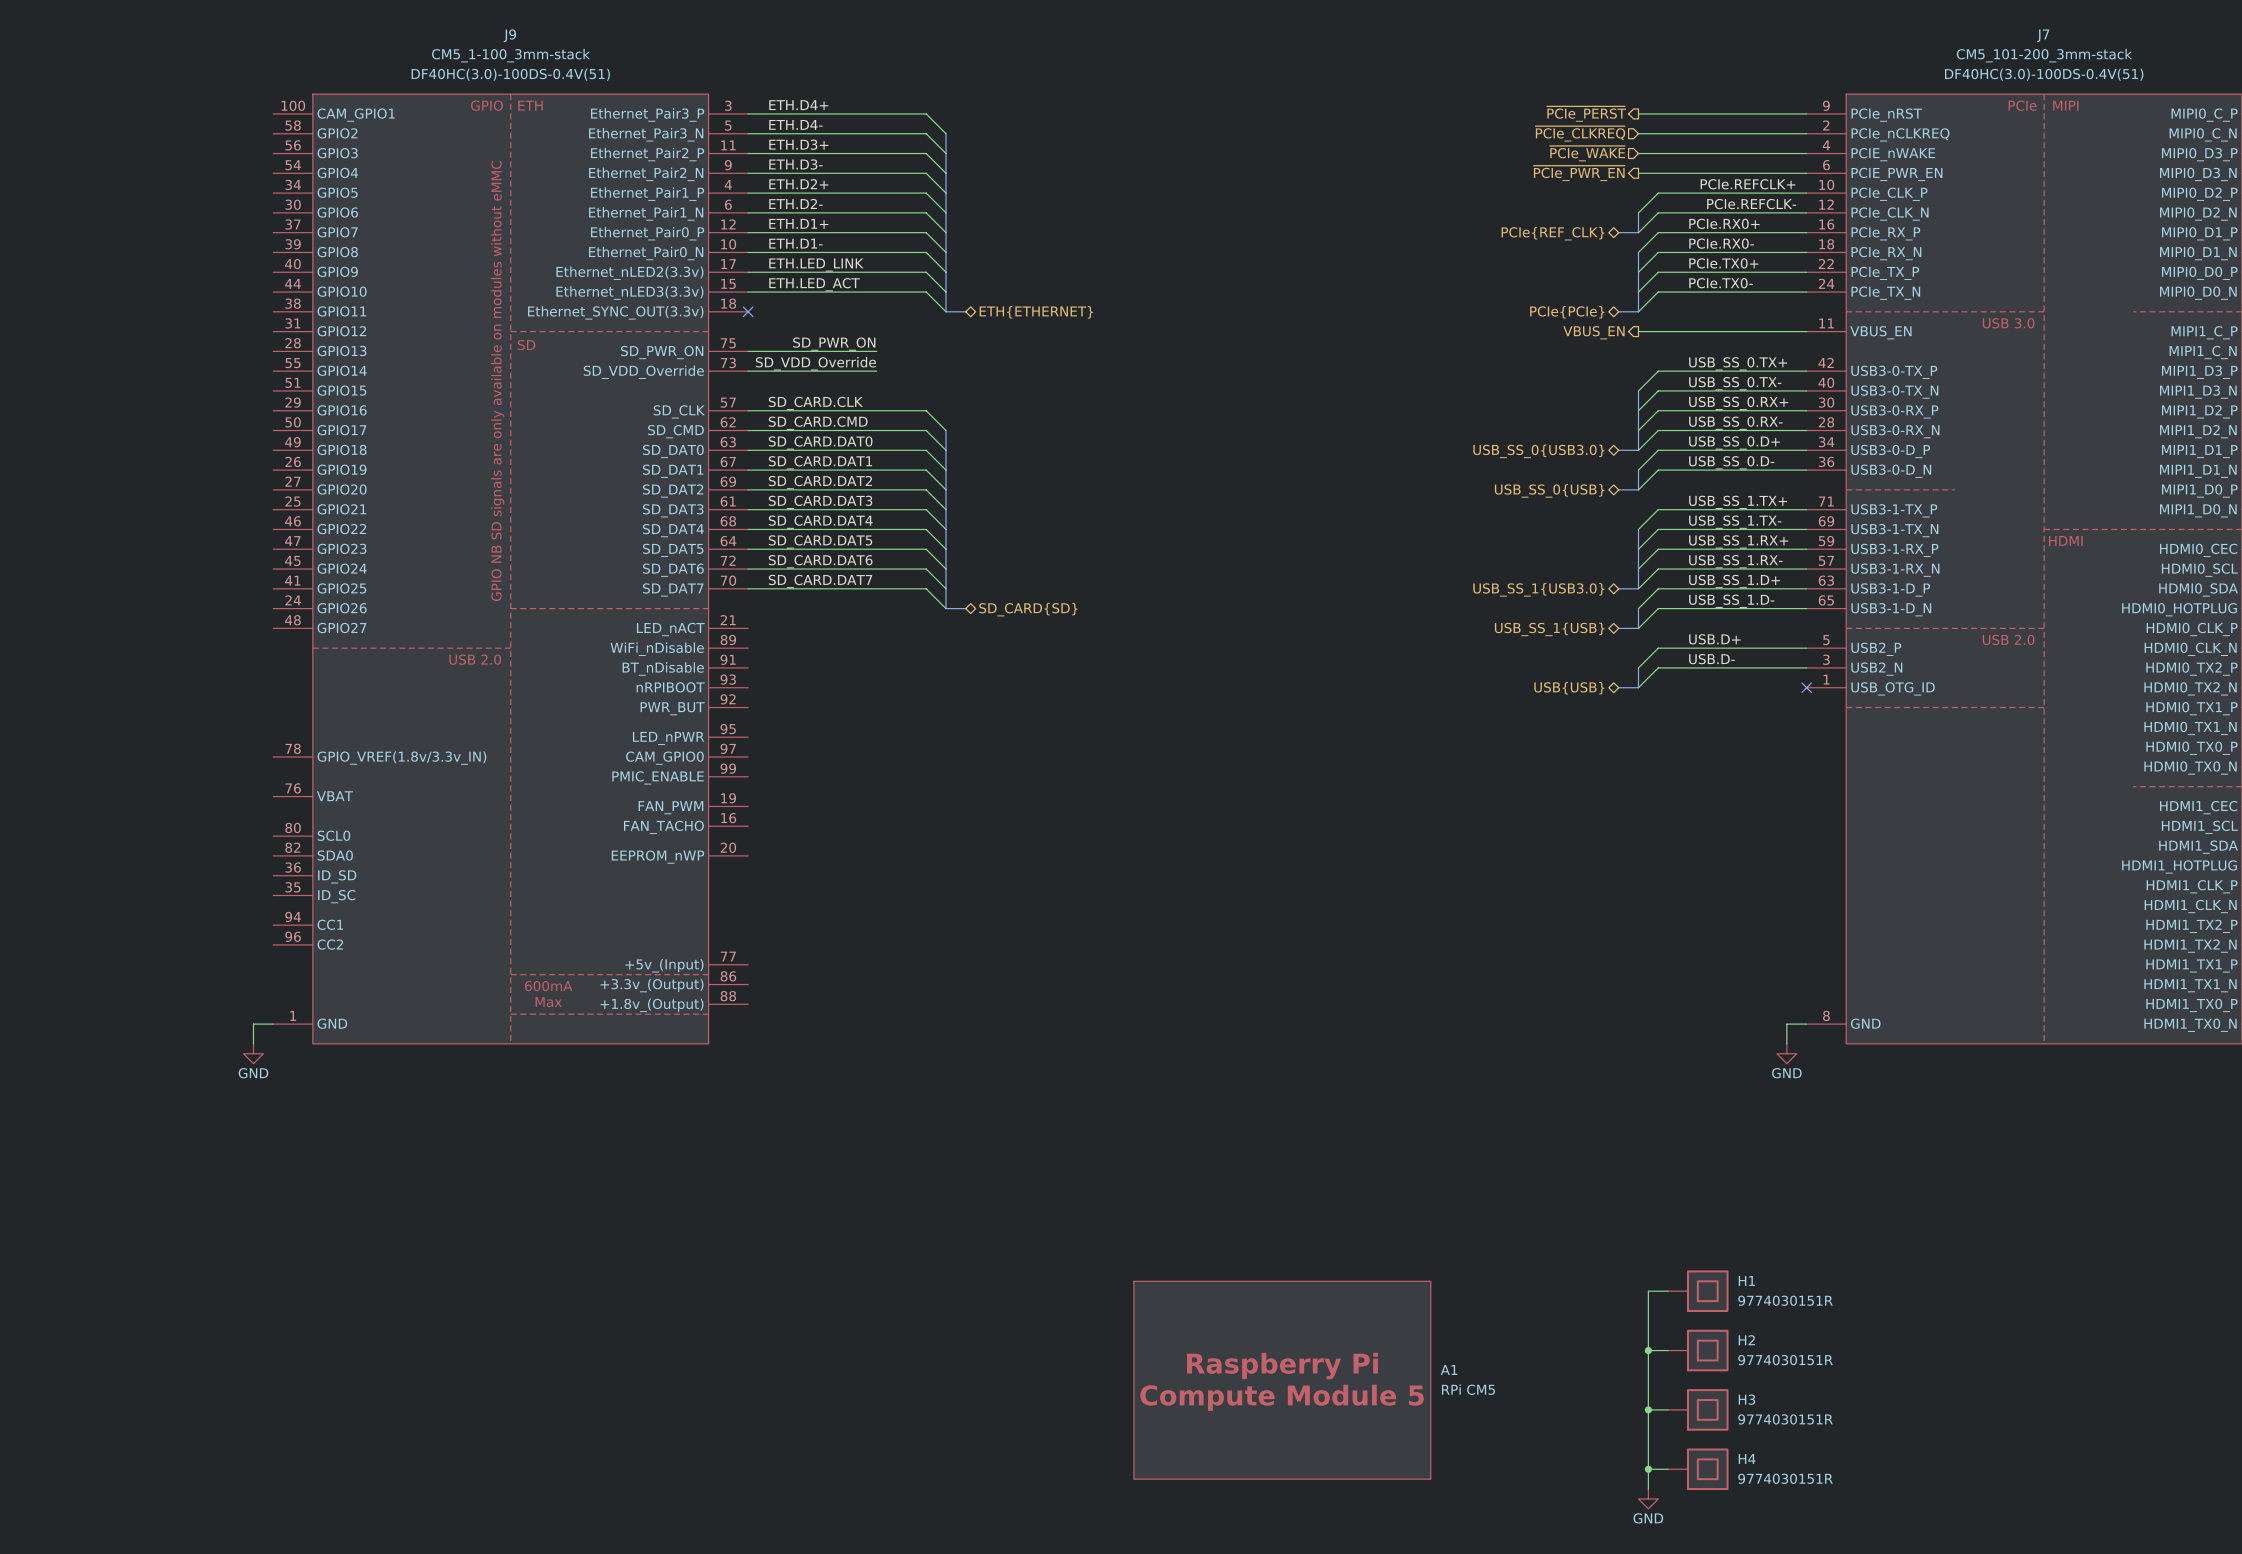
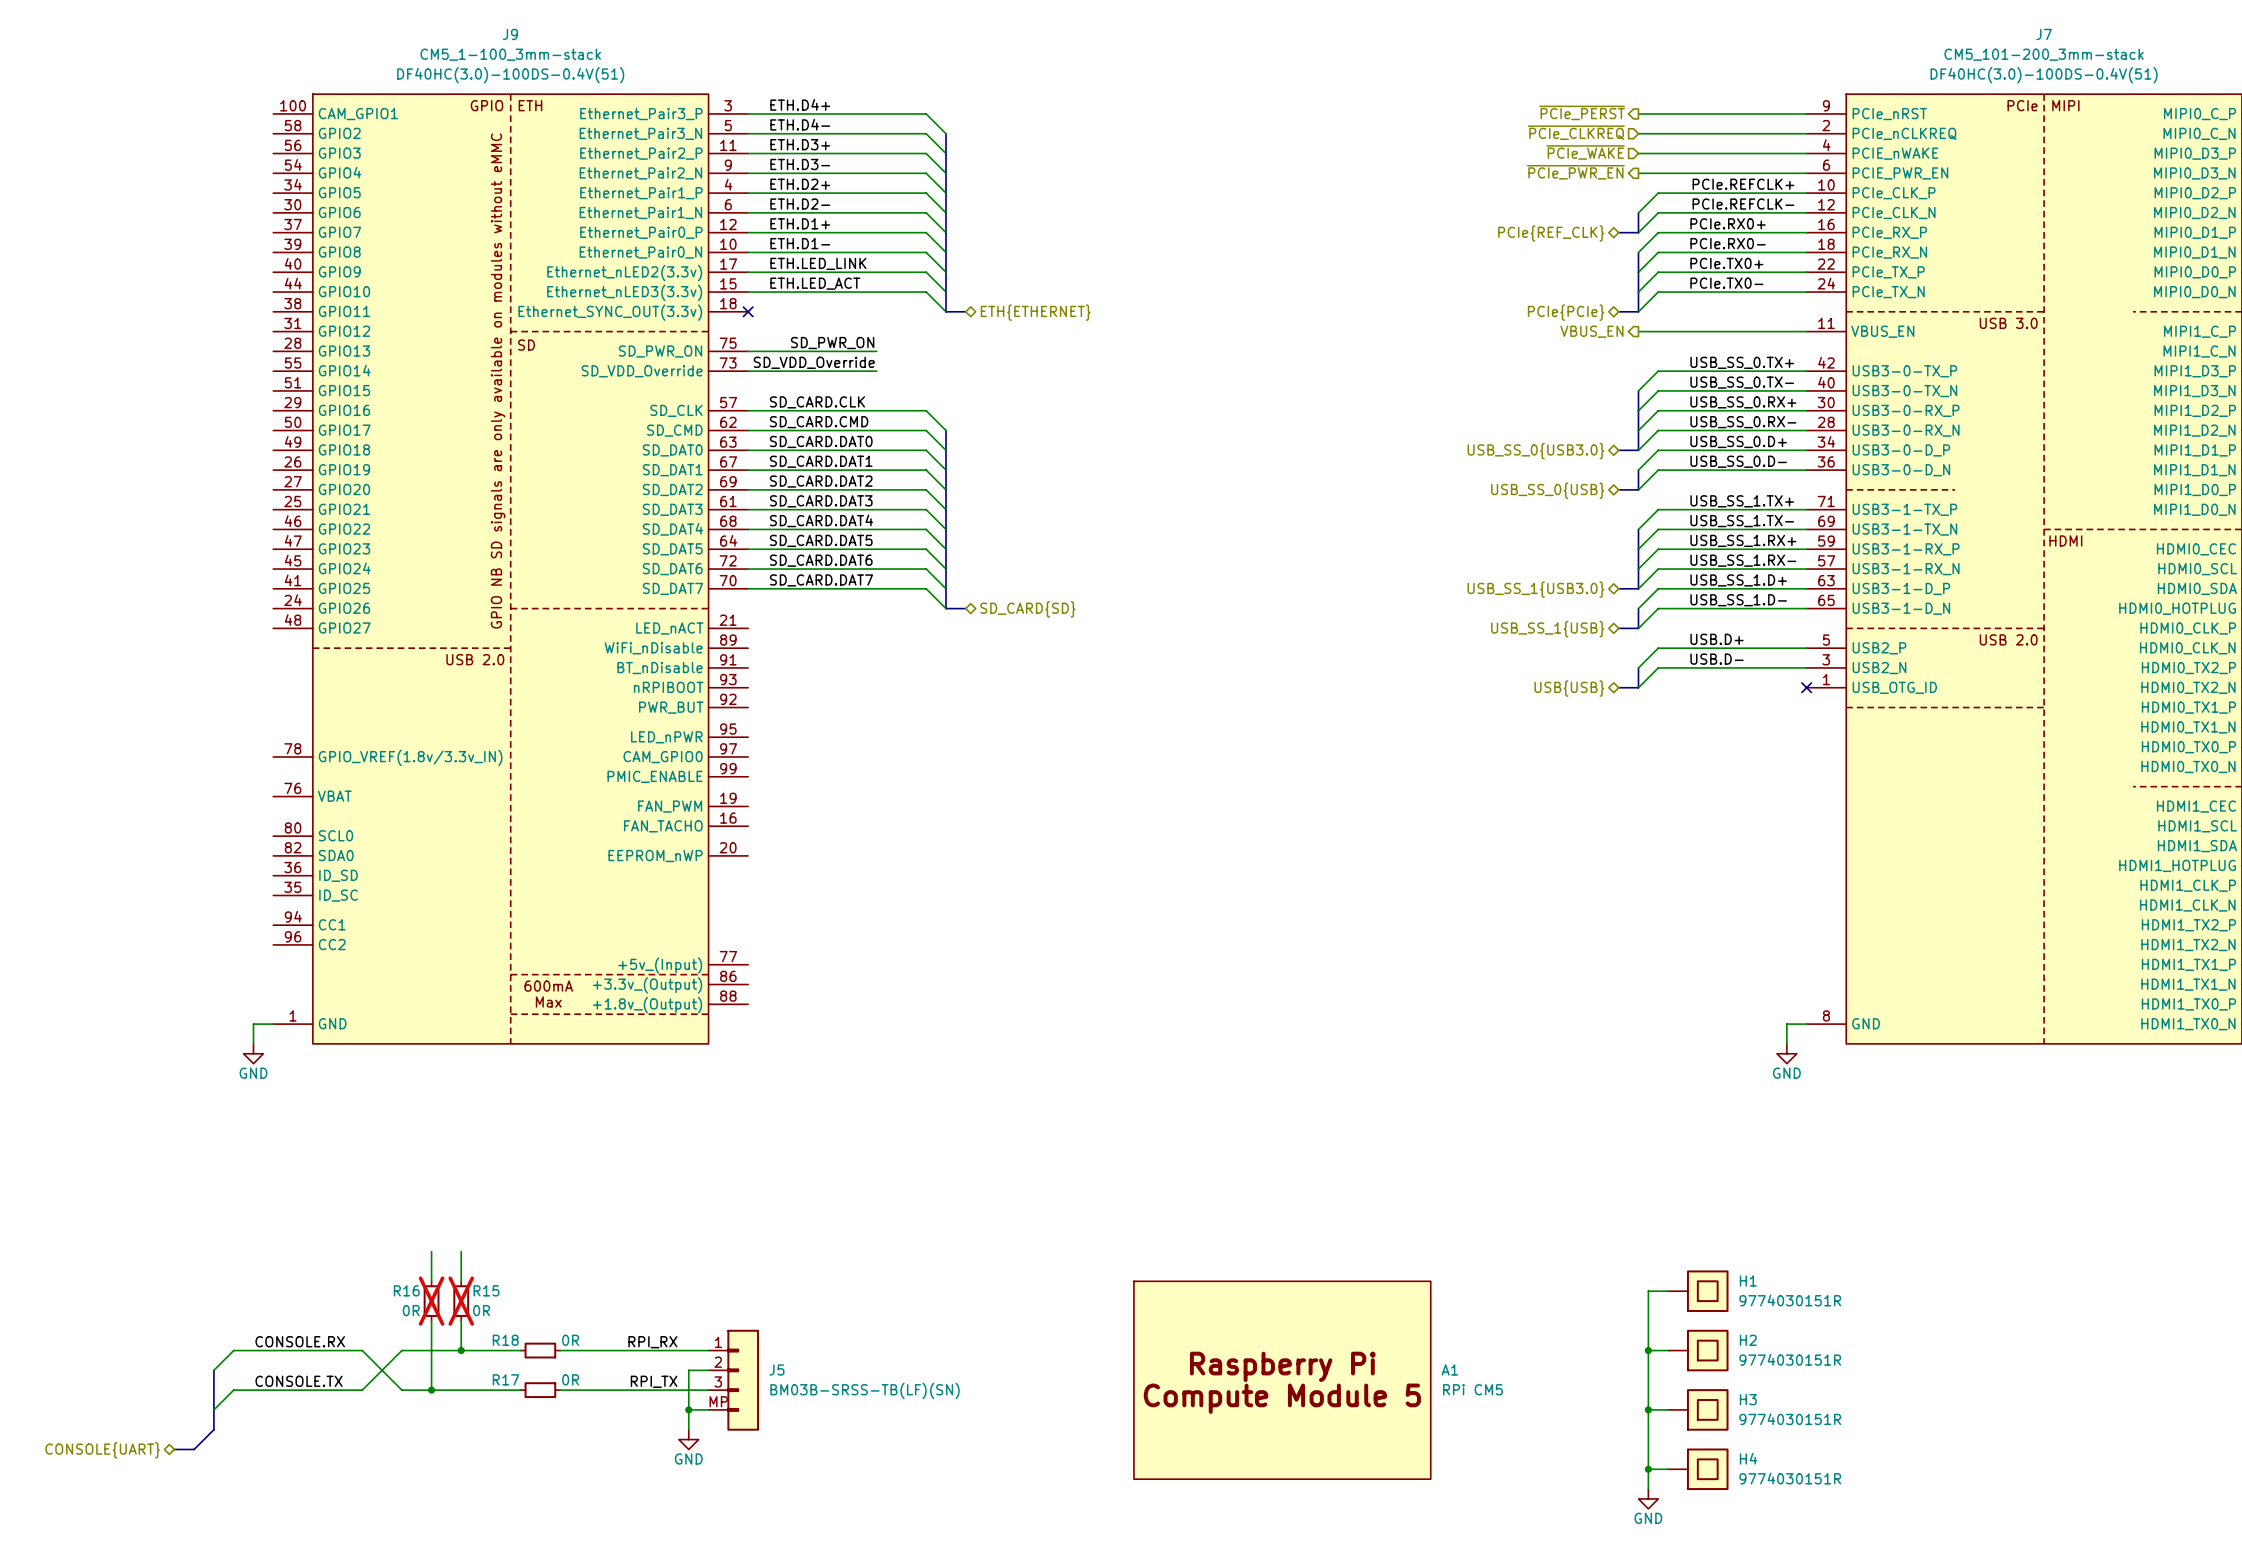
wire: none -> (431, 1251) (431, 1281)
wire: none -> (461, 1251) (461, 1281)
R16: none -> (431, 1301)
R15: none -> (461, 1301)
wire: none -> (431, 1320) (431, 1390)
wire: none -> (461, 1320) (461, 1350)
label: none -> CONSOLE.RX (300, 1341)
label: none -> RPI_RX (652, 1342)
junction: none -> (461, 1350)
wire: none -> (520, 1350) (401, 1350) (362, 1390) (233, 1390) (213, 1409)
R18: none -> (540, 1350)
wire: none -> (560, 1350) (708, 1350)
wire: none -> (213, 1370) (233, 1350) (362, 1350) (401, 1390) (520, 1390)
bus: none -> (213, 1370) (213, 1429) (194, 1449) (174, 1449)
wire: none -> (708, 1370) (688, 1370) (688, 1429)
J5: none -> (733, 1380)
label: none -> CONSOLE.TX (299, 1381)
label: none -> RPI_TX (654, 1381)
junction: none -> (431, 1390)
R17: none -> (540, 1390)
wire: none -> (560, 1390) (708, 1390)
wire: none -> (688, 1409) (708, 1409)
junction: none -> (688, 1409)
power symbol: none -> GND (688, 1439)
hierarchical label: none -> CONSOLE{UART} (102, 1450)

